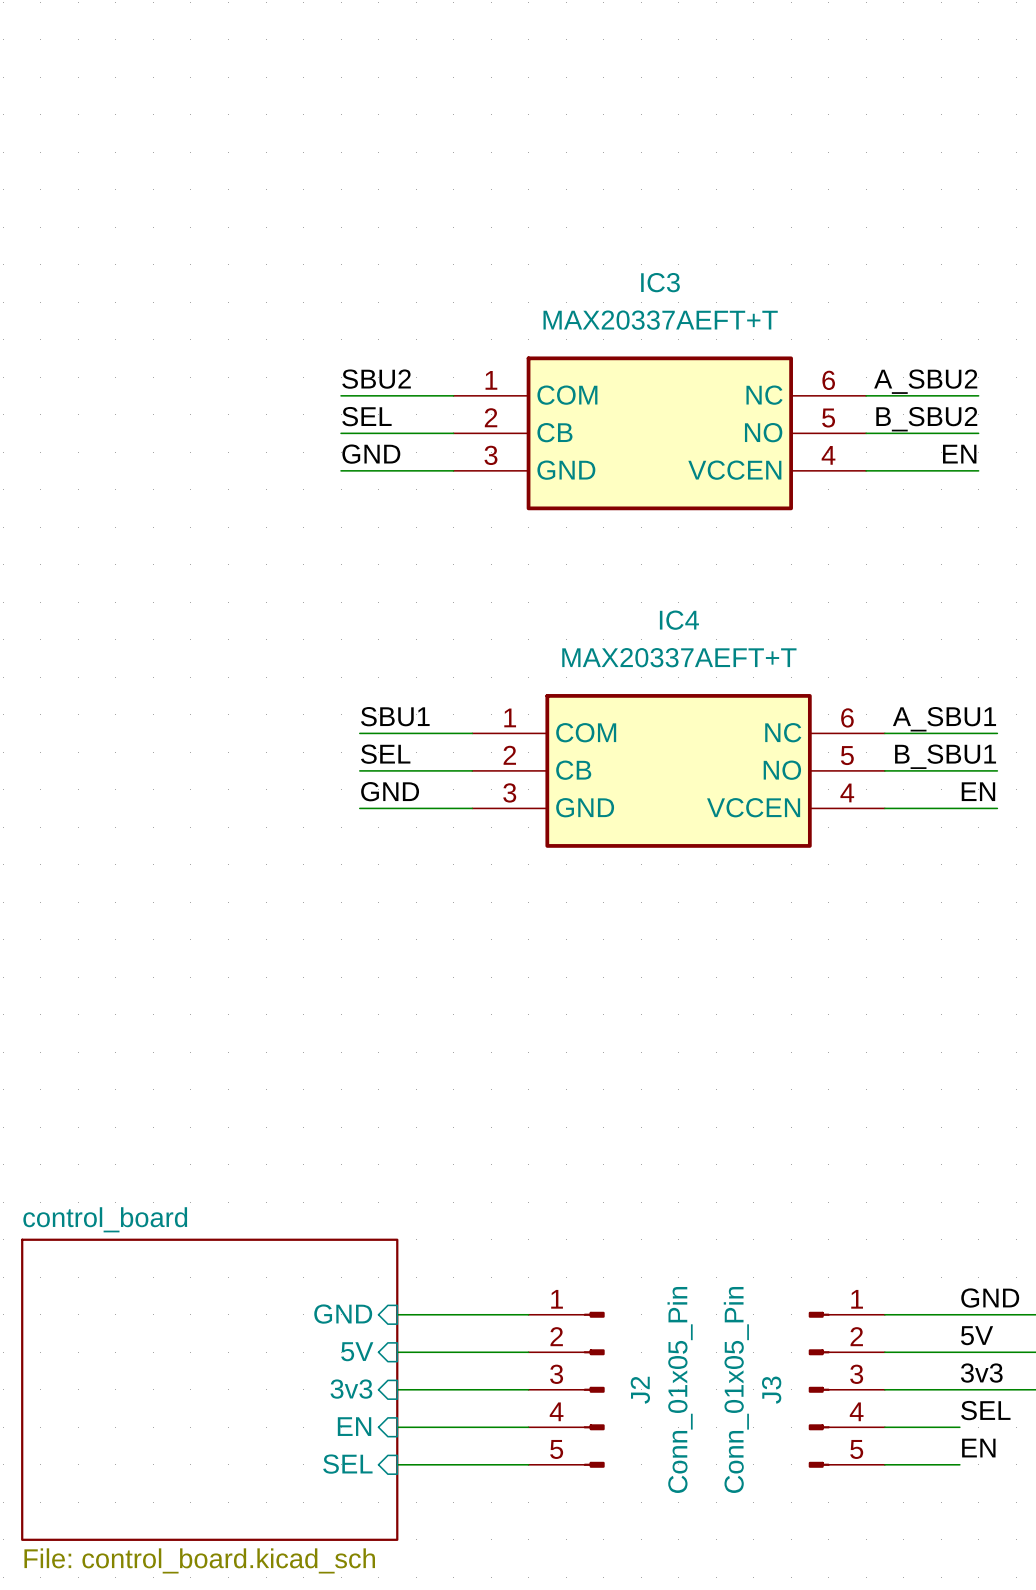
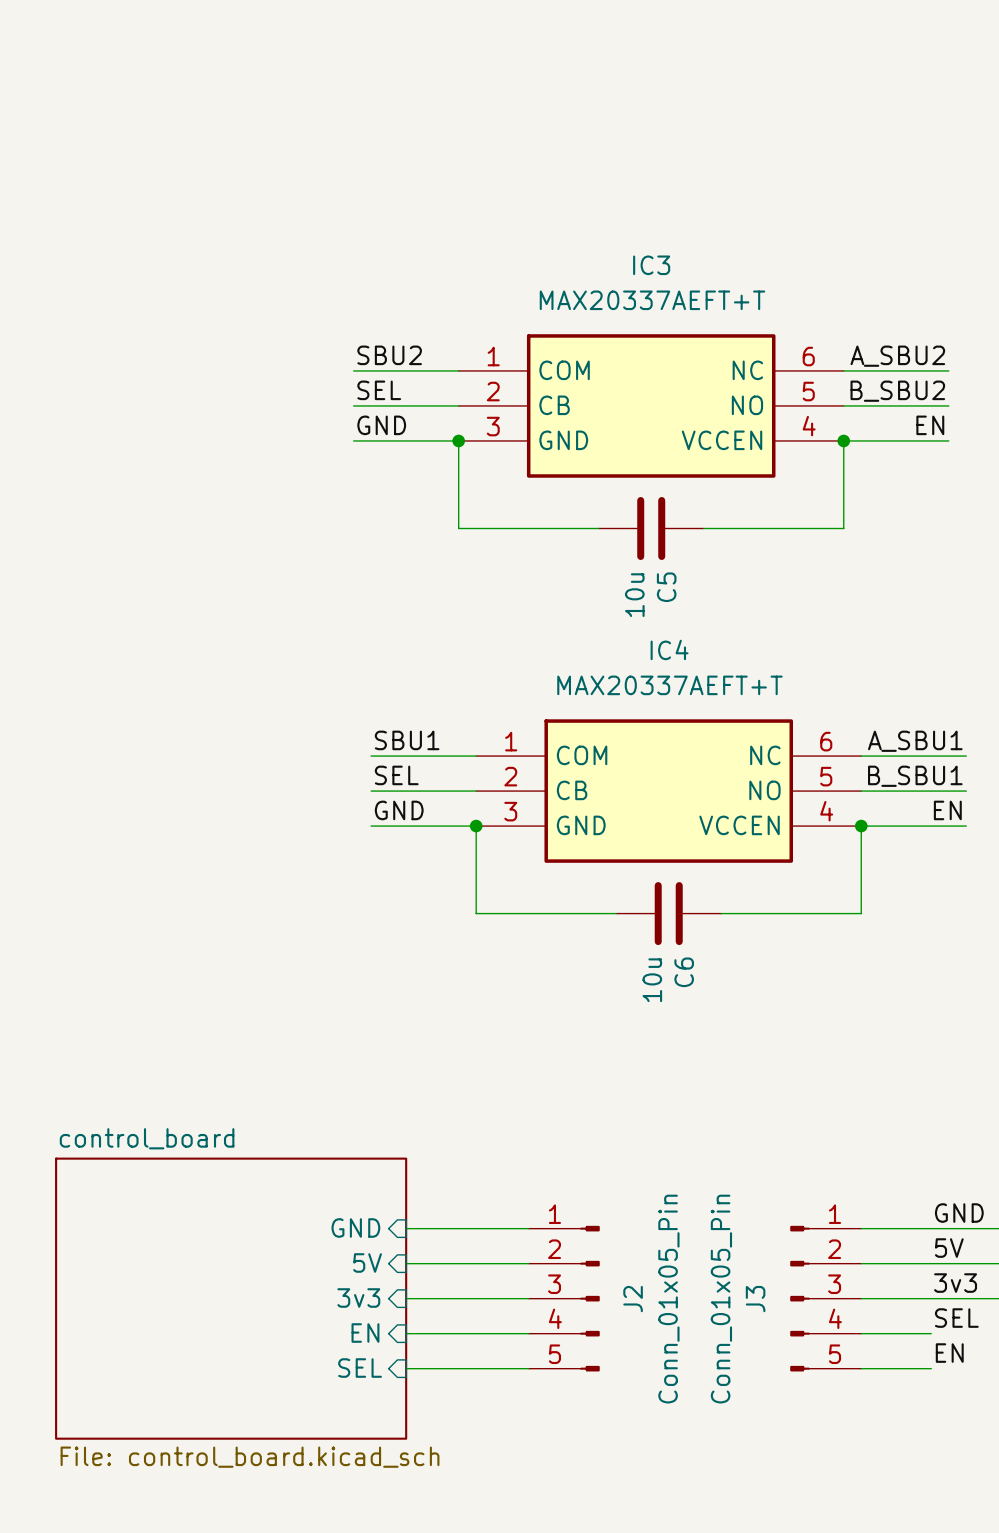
wire: none -> (458, 440) (458, 528) (598, 528)
junction: none -> (458, 440)
wire: none -> (843, 440) (843, 528) (703, 528)
junction: none -> (843, 440)
C5: none -> 10u (651, 528)
label: SBU1 (395, 716) -> none
label: A_SBU1 (944, 719) -> none
wire: (359, 733) (472, 733) -> none
wire: (884, 733) (997, 733) -> none
label position: SEL (385, 754) -> SEL (396, 775)
label position: B_SBU1 (945, 756) -> B_SBU1 (915, 776)
wire: (359, 770) (472, 770) -> (371, 791) (476, 791)
IC4 position: (678, 770) -> (668, 791)
wire: (884, 770) (997, 770) -> (861, 791) (966, 791)
label: GND (390, 791) -> SBU1 (407, 740)
label: EN (978, 791) -> A_SBU1 (915, 741)
label: none -> GND (399, 810)
label: none -> EN (947, 810)
wire: none -> (371, 826) (476, 826) (476, 913) (616, 913)
junction: none -> (476, 826)
junction: none -> (861, 826)
wire: none -> (966, 826) (861, 826) (861, 913) (721, 913)
C6: none -> 10u (668, 913)

